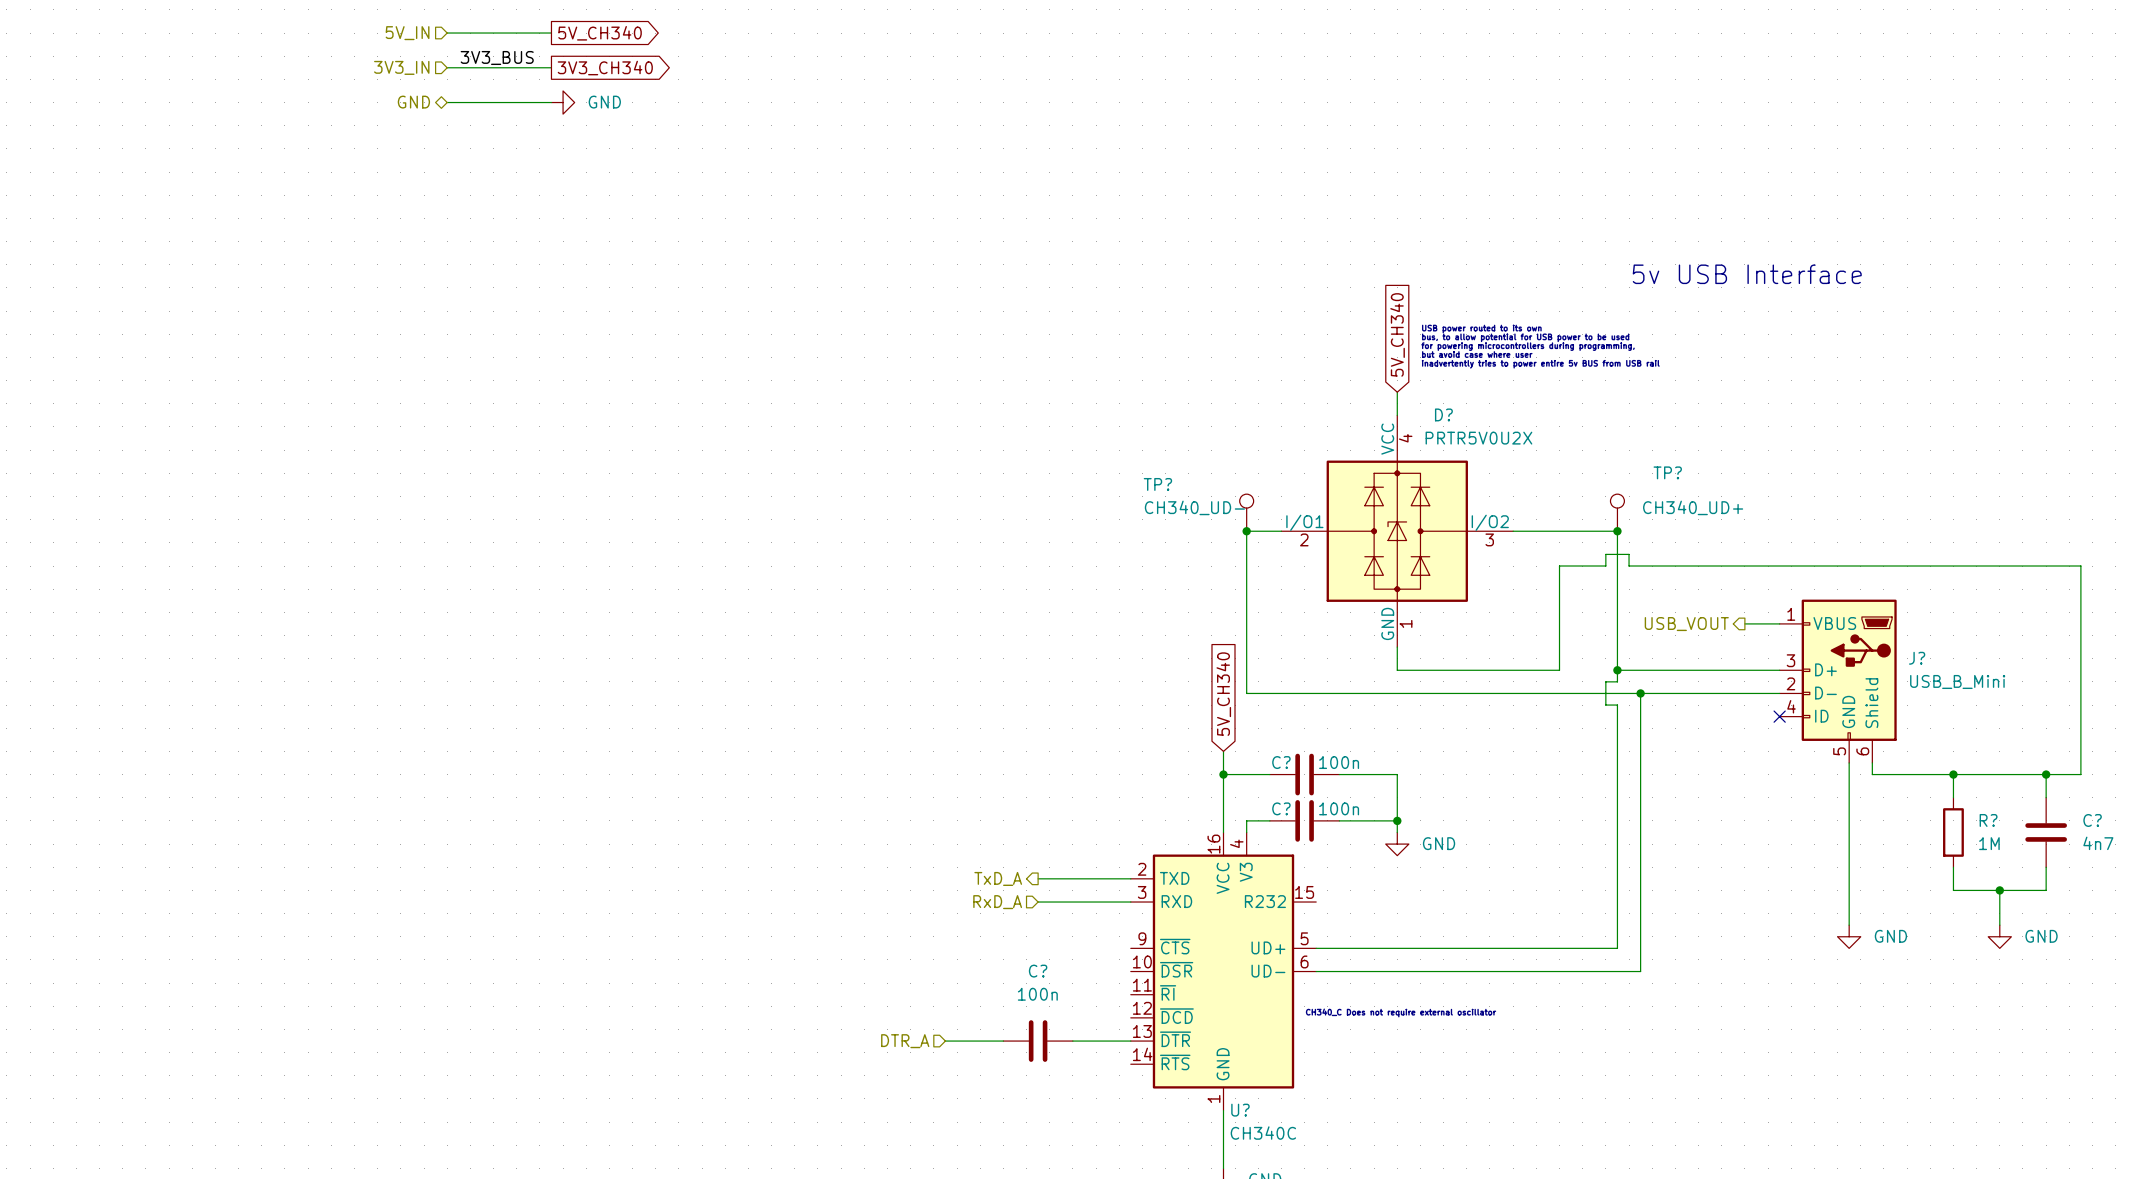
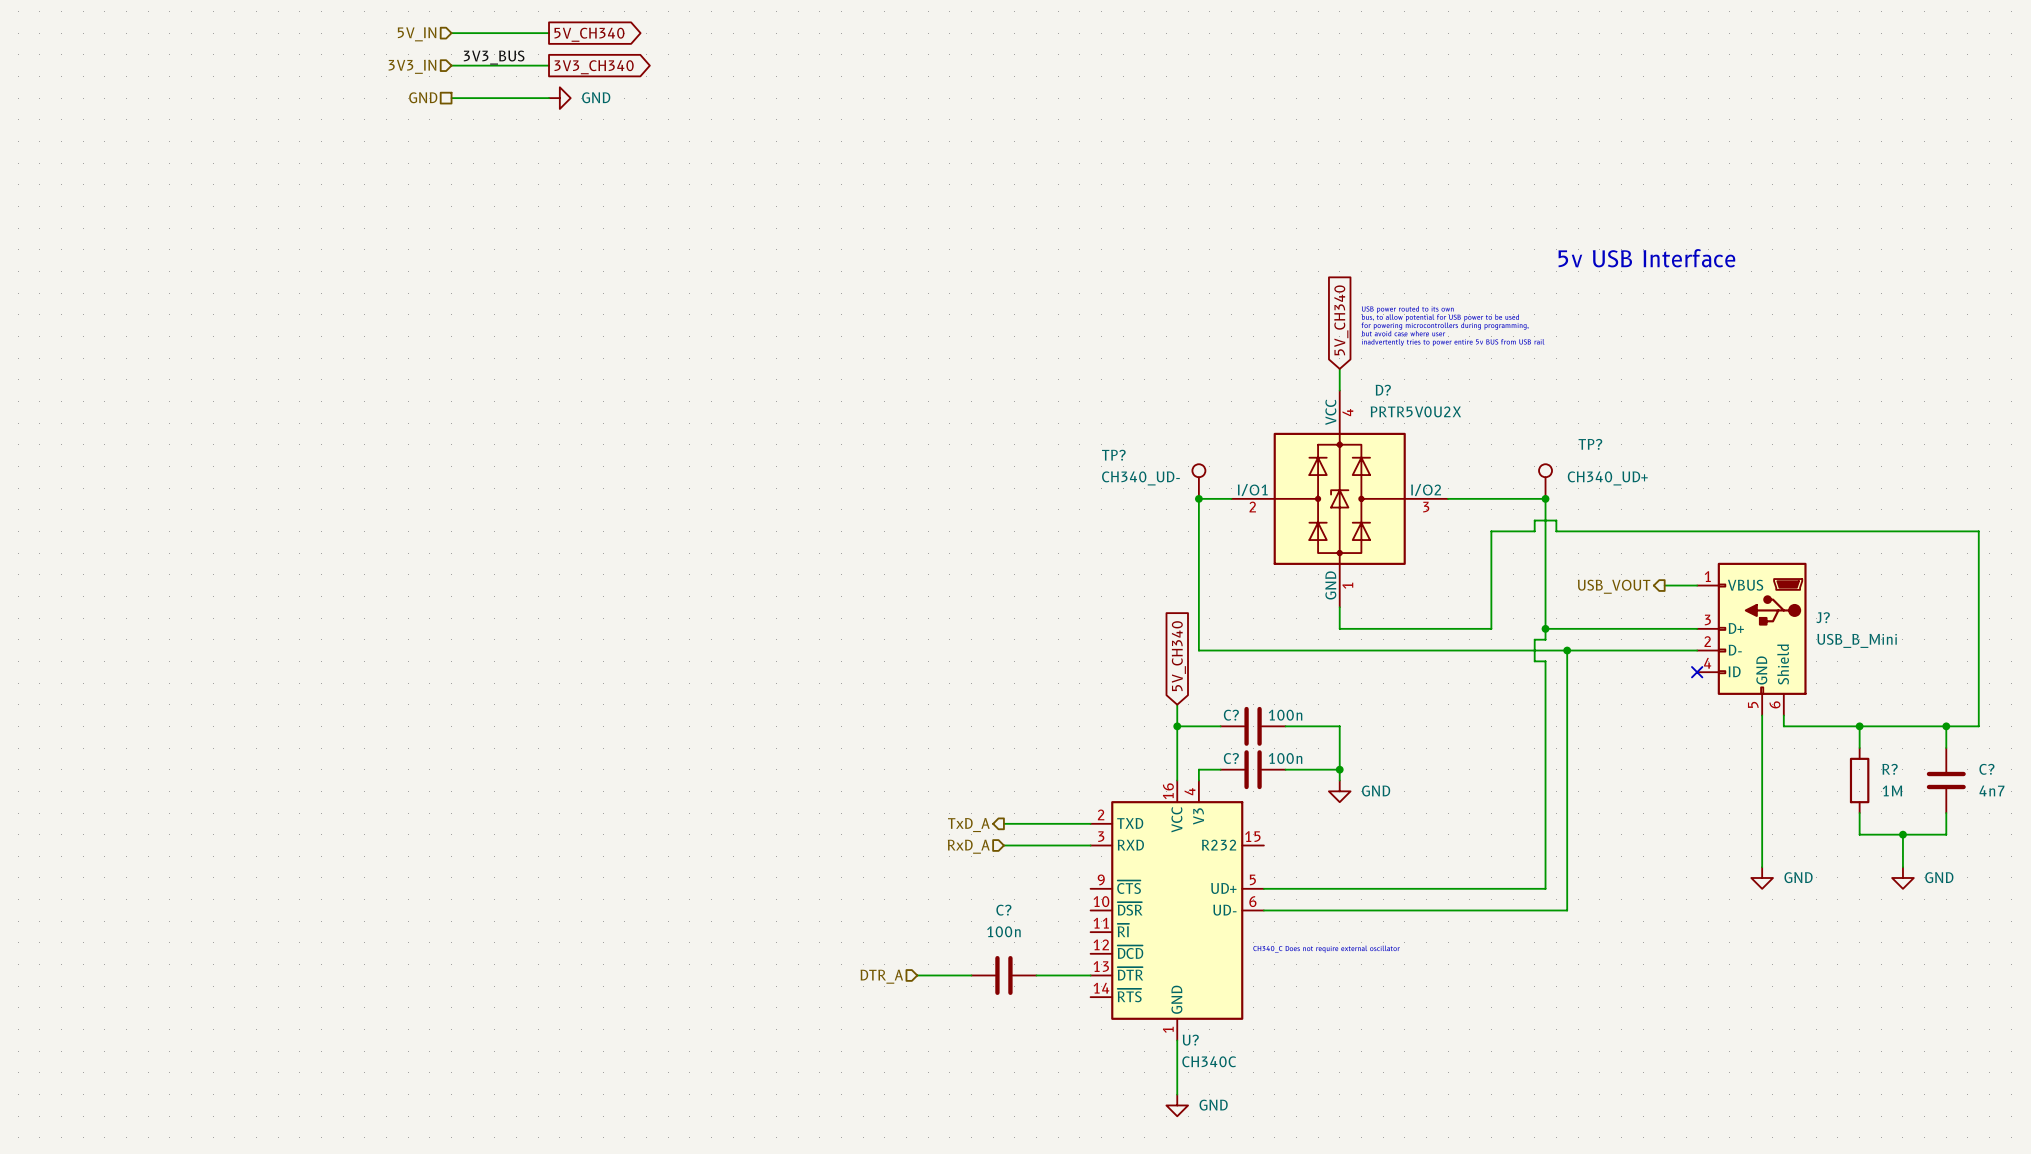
hierarchical label shape: bidirectional (413, 102) -> passive (423, 97)

